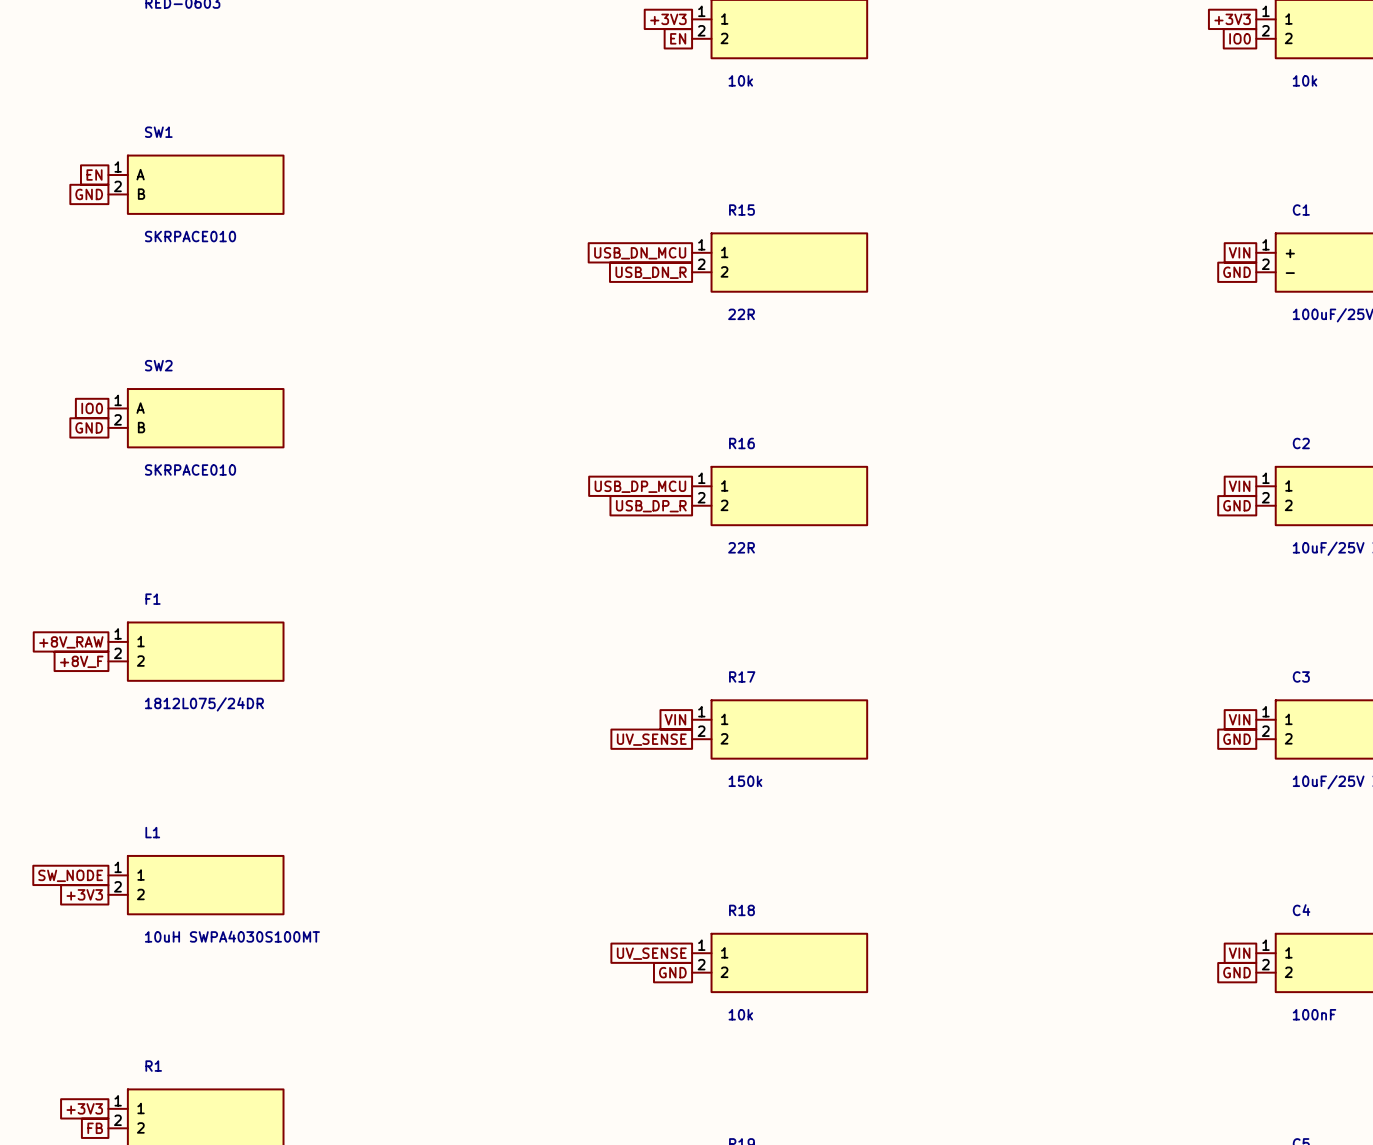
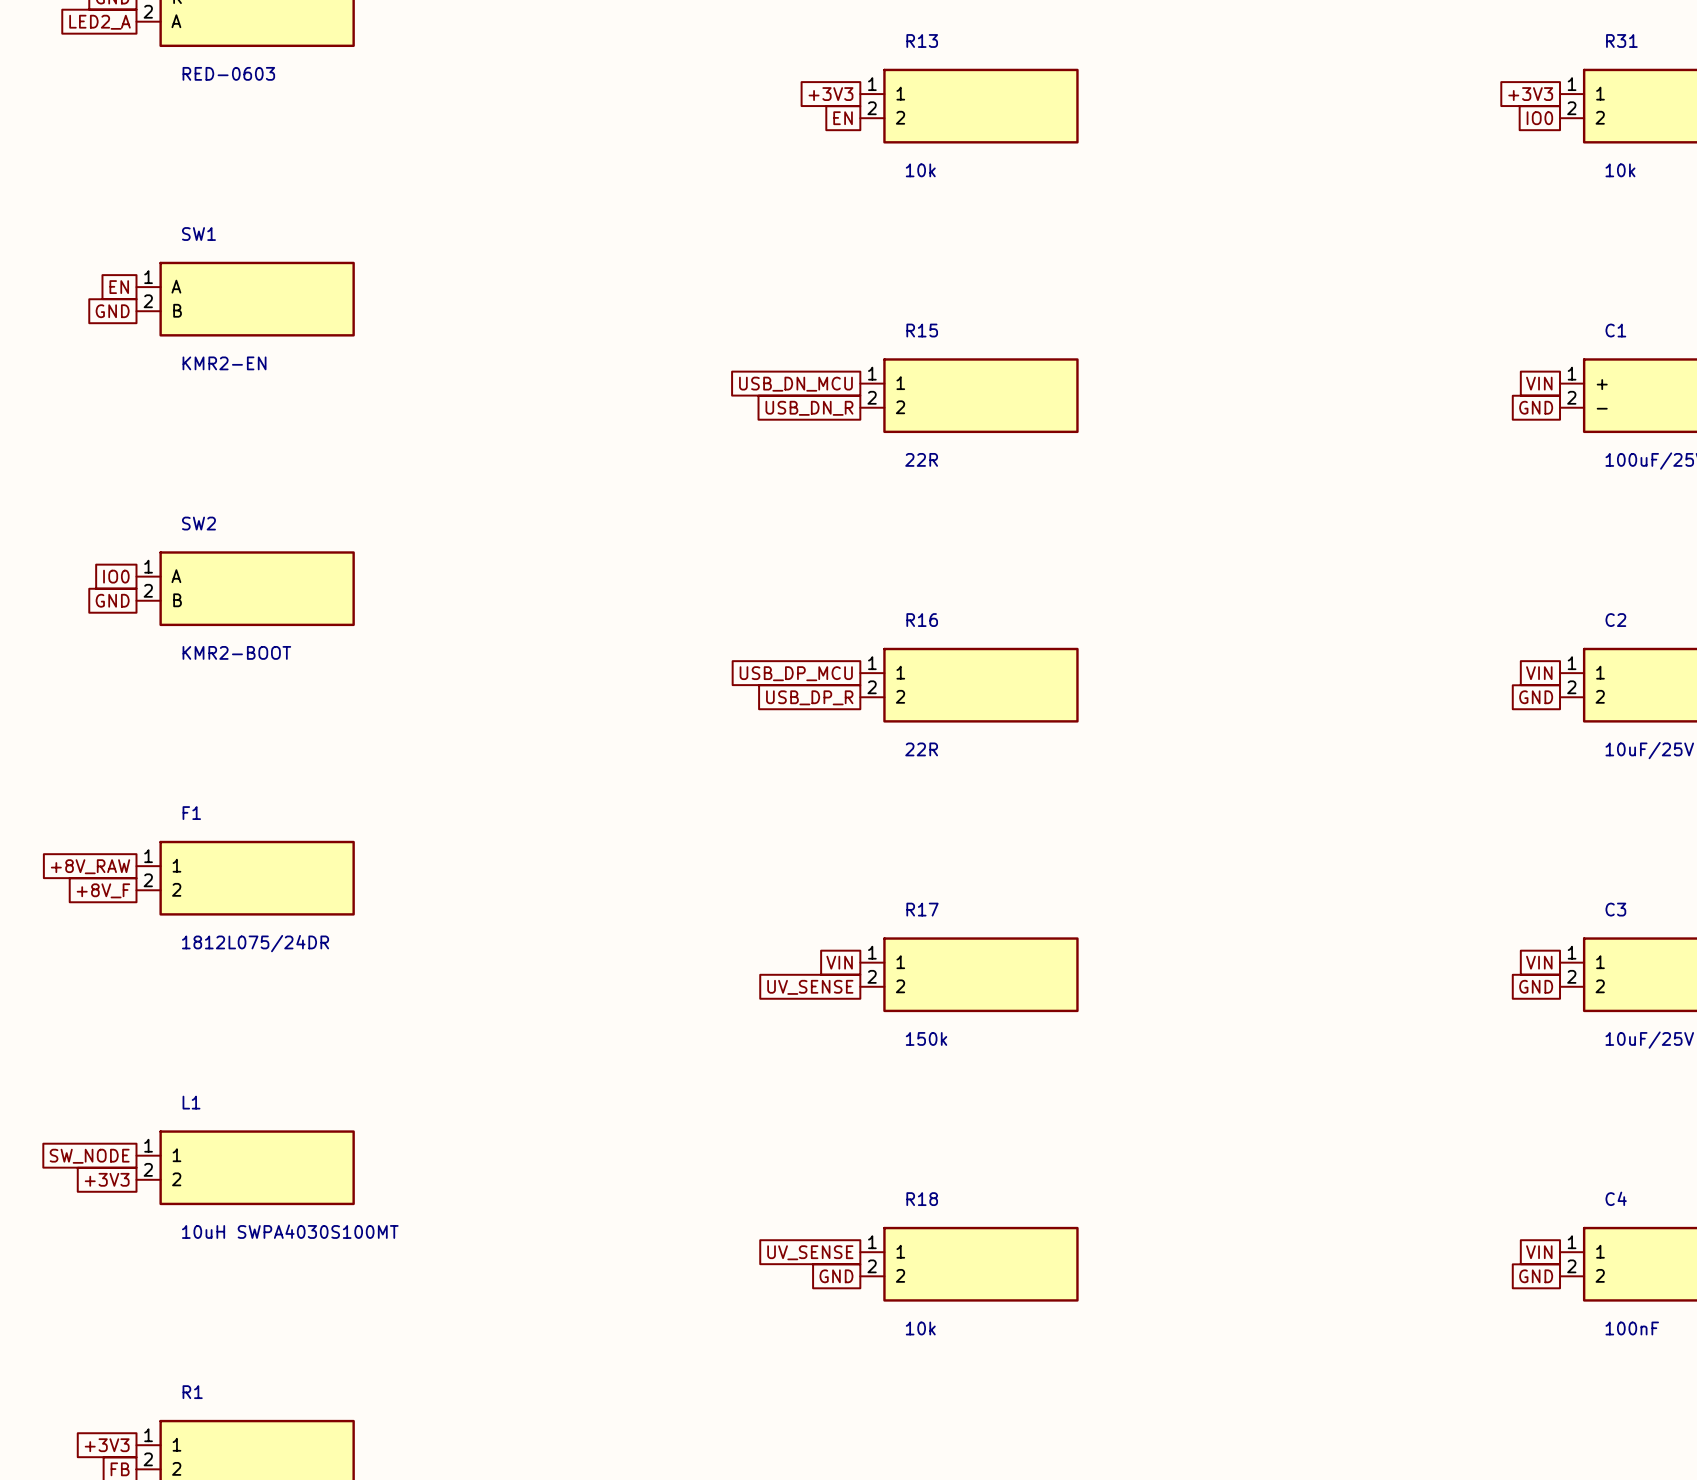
SW1 value: SKRPACE010 (190, 236) -> KMR2-EN (224, 363)
SW2 value: SKRPACE010 (190, 469) -> KMR2-BOOT (236, 652)

